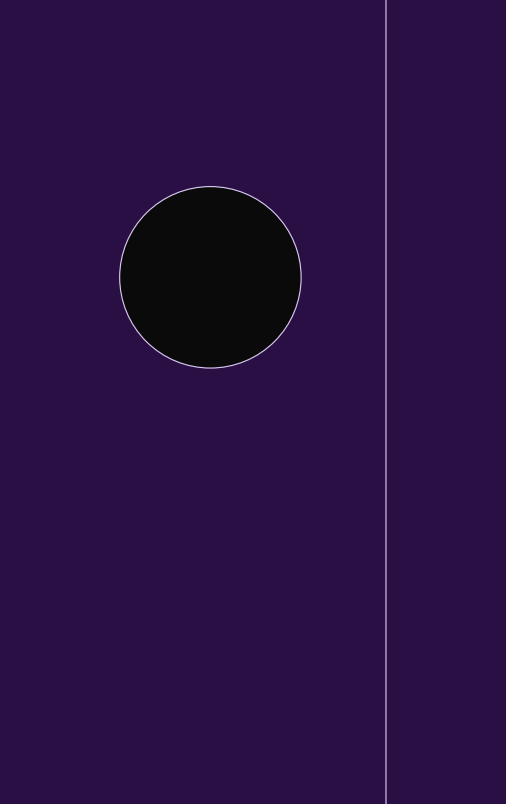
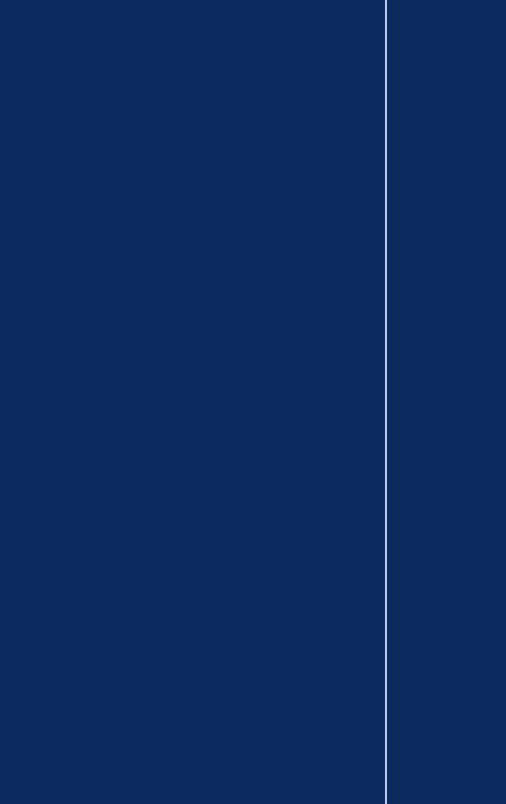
hole: (210, 277) -> none

